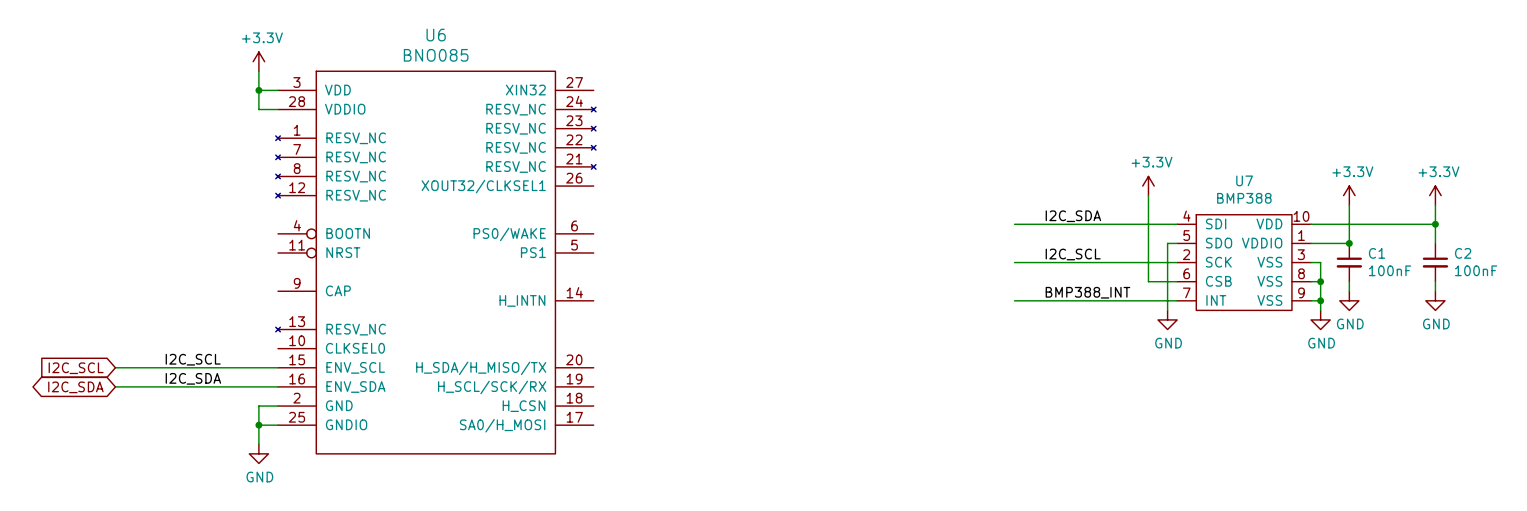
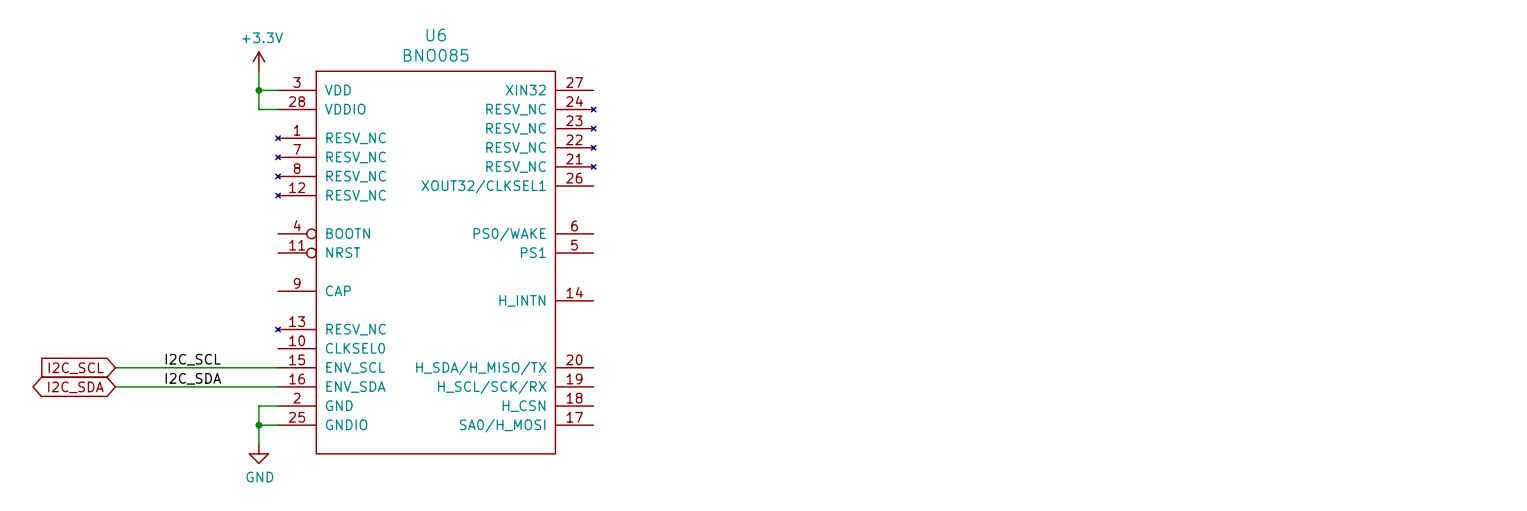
power symbol: +3.3V (1148, 186) -> none
wire: (1148, 195) (1148, 281) (1177, 281) -> none
power symbol: +3.3V (1349, 195) -> none
power symbol: +3.3V (1435, 195) -> none
wire: (1349, 205) (1349, 243) (1311, 243) -> none
wire: (1435, 205) (1435, 243) -> none
label: I2C_SDA (1073, 216) -> none
wire: (1014, 224) (1177, 224) -> none
wire: (1311, 224) (1435, 224) -> none
junction: (1435, 224) -> none
wire: (1177, 243) (1167, 243) (1167, 310) -> none
junction: (1349, 243) -> none
label: I2C_SCL (1073, 254) -> none
wire: (1014, 262) (1177, 262) -> none
U7: BMP388 (1244, 262) -> none
wire: (1311, 262) (1320, 262) (1320, 310) -> none
C1: 100nF (1349, 262) -> none
C2: 100nF (1435, 262) -> none
wire: (1311, 281) (1320, 281) -> none
junction: (1320, 281) -> none
wire: (1349, 281) (1349, 291) -> none
wire: (1435, 281) (1435, 291) -> none
label: BMP388_INT (1087, 292) -> none
wire: (1014, 300) (1177, 300) -> none
wire: (1311, 300) (1320, 300) -> none
junction: (1320, 300) -> none
power symbol: GND (1349, 300) -> none
power symbol: GND (1435, 300) -> none
power symbol: GND (1167, 319) -> none
power symbol: GND (1320, 319) -> none

